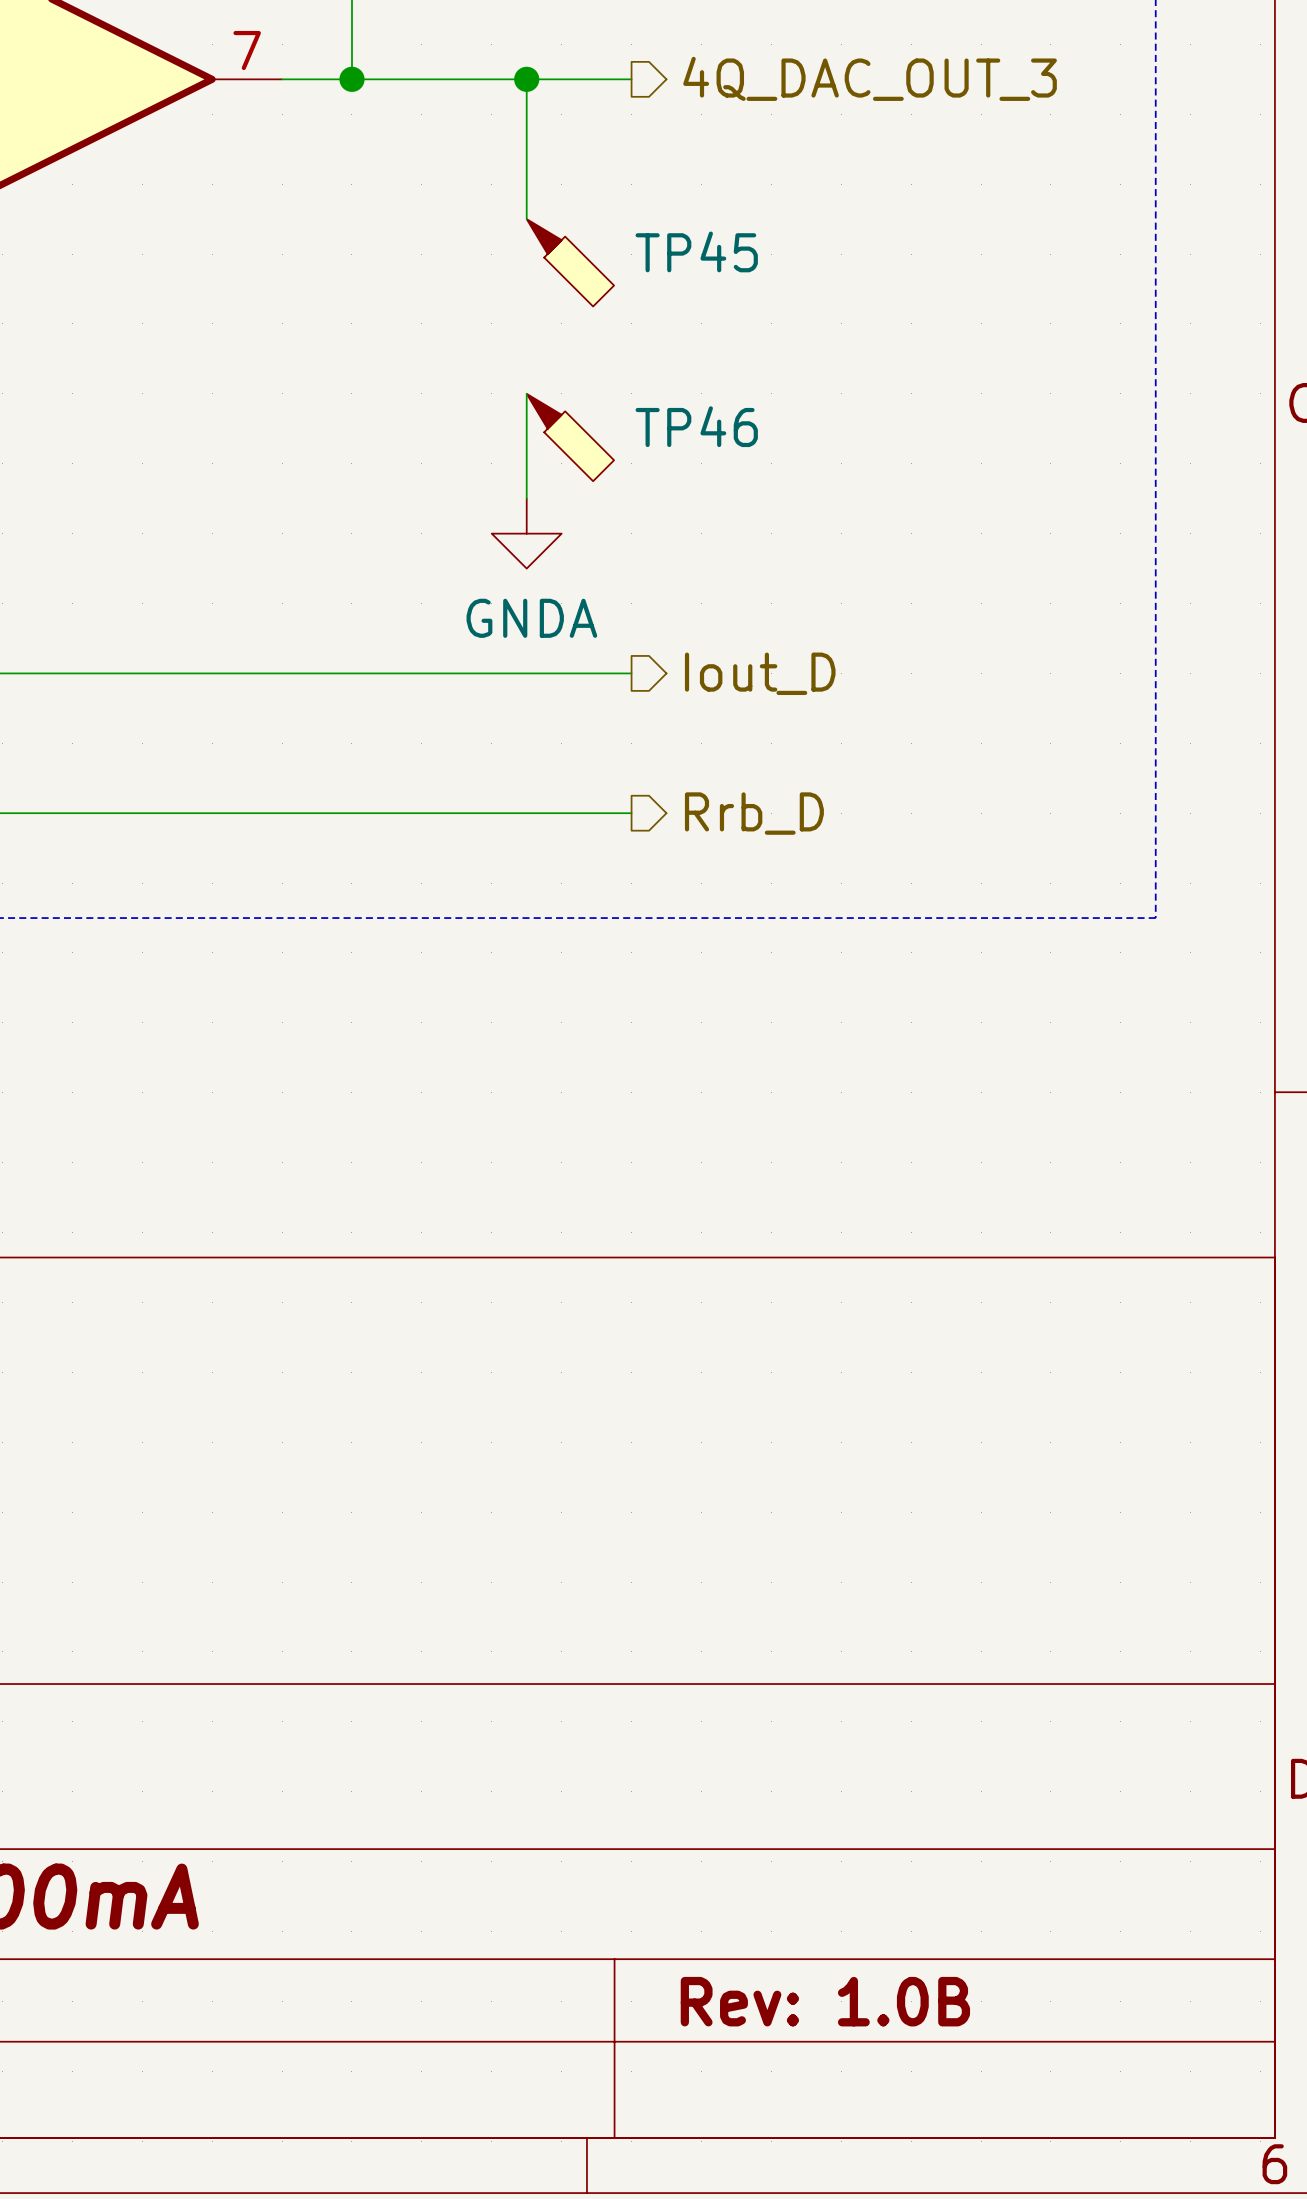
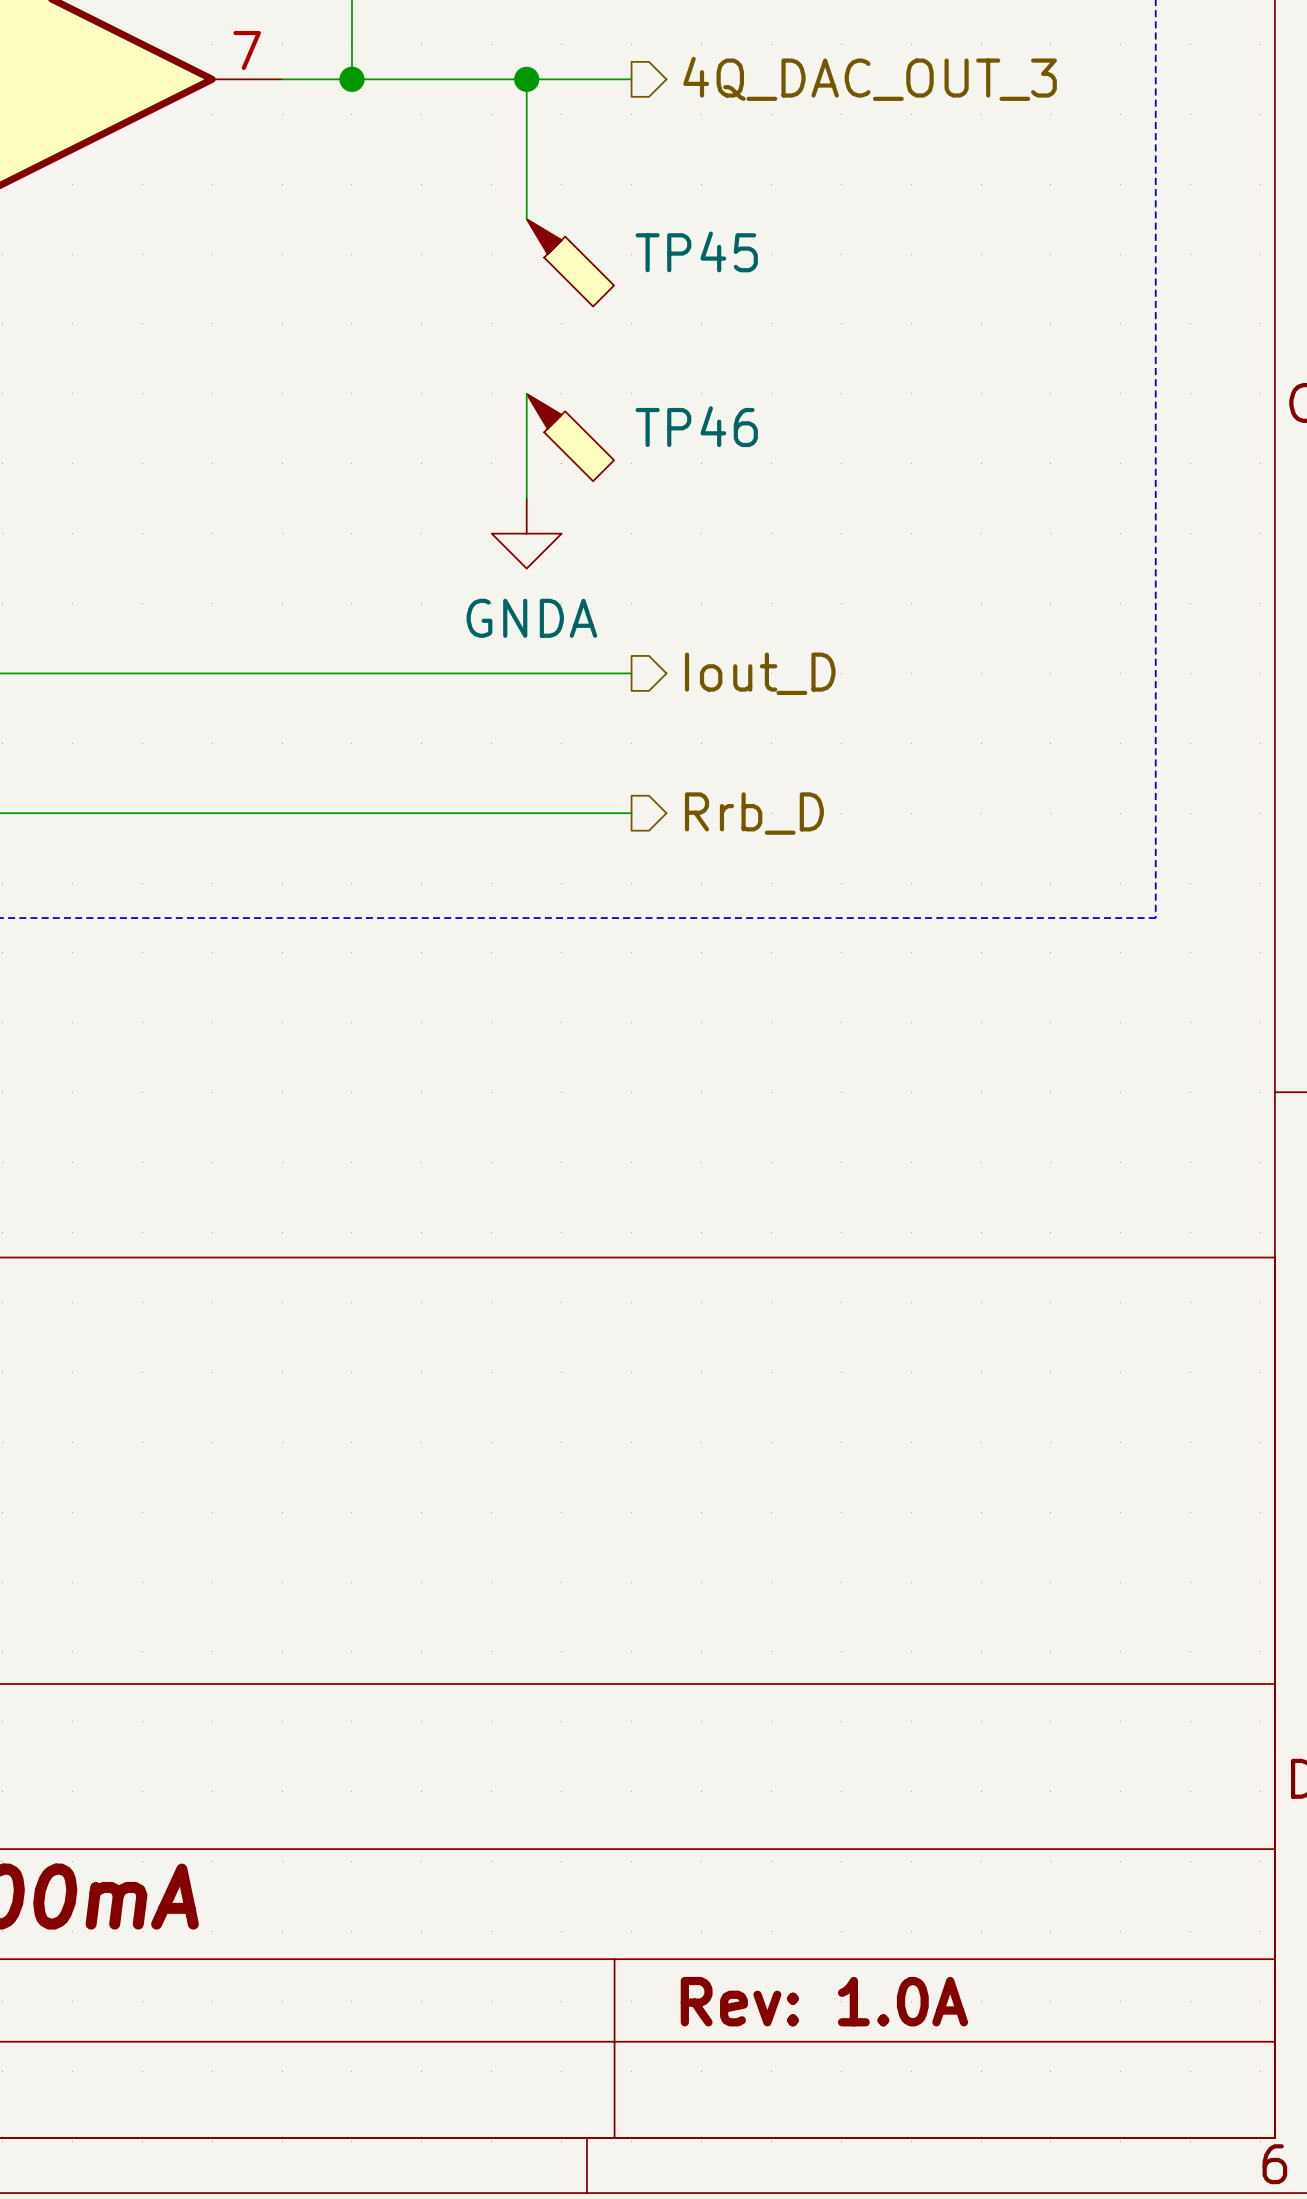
title block: Rev: 1.0B (825, 2001) -> Rev: 1.0A (824, 2001)

